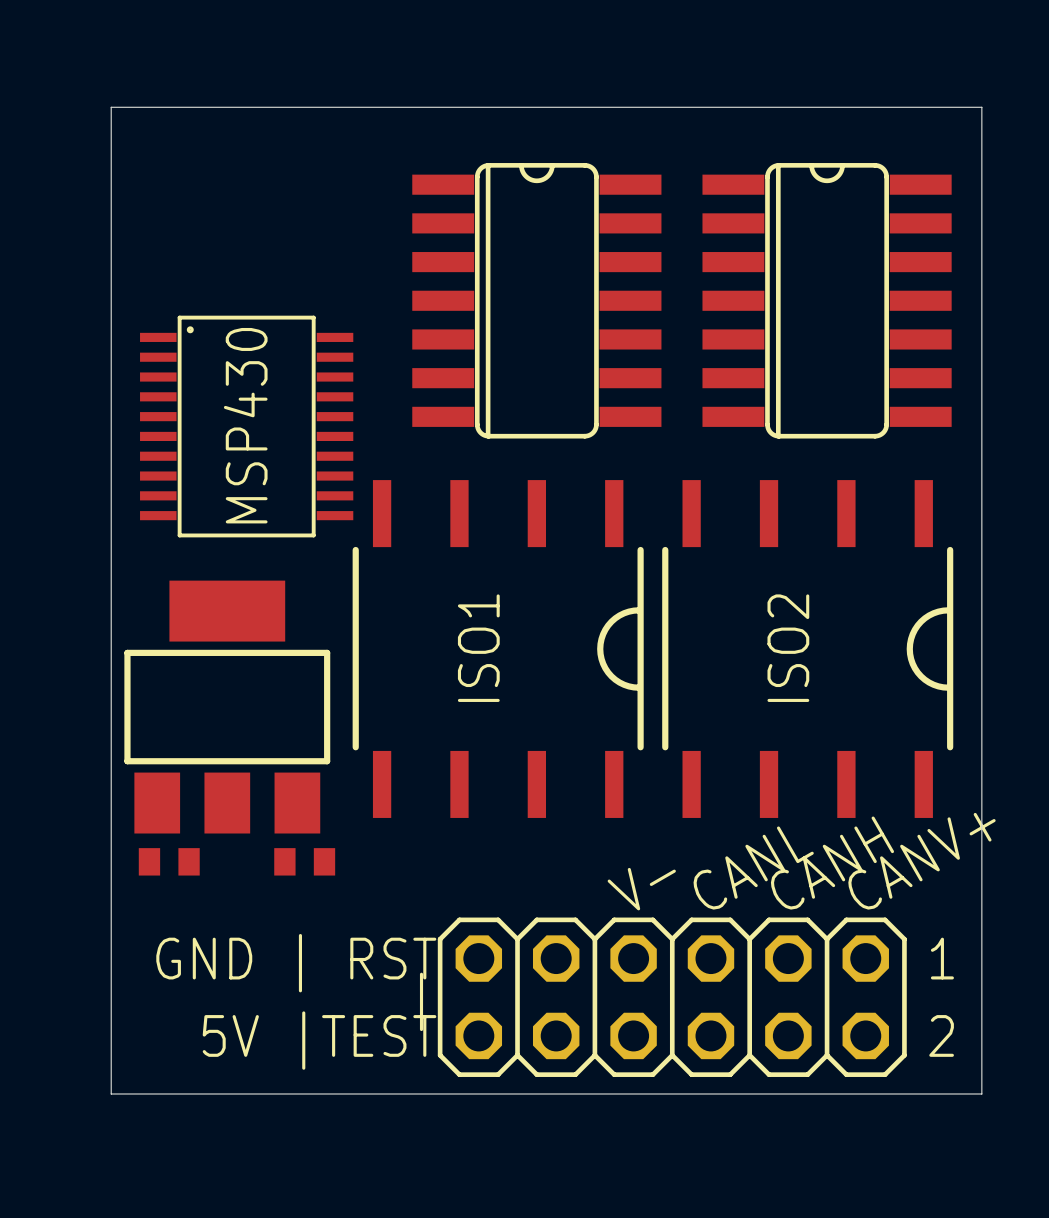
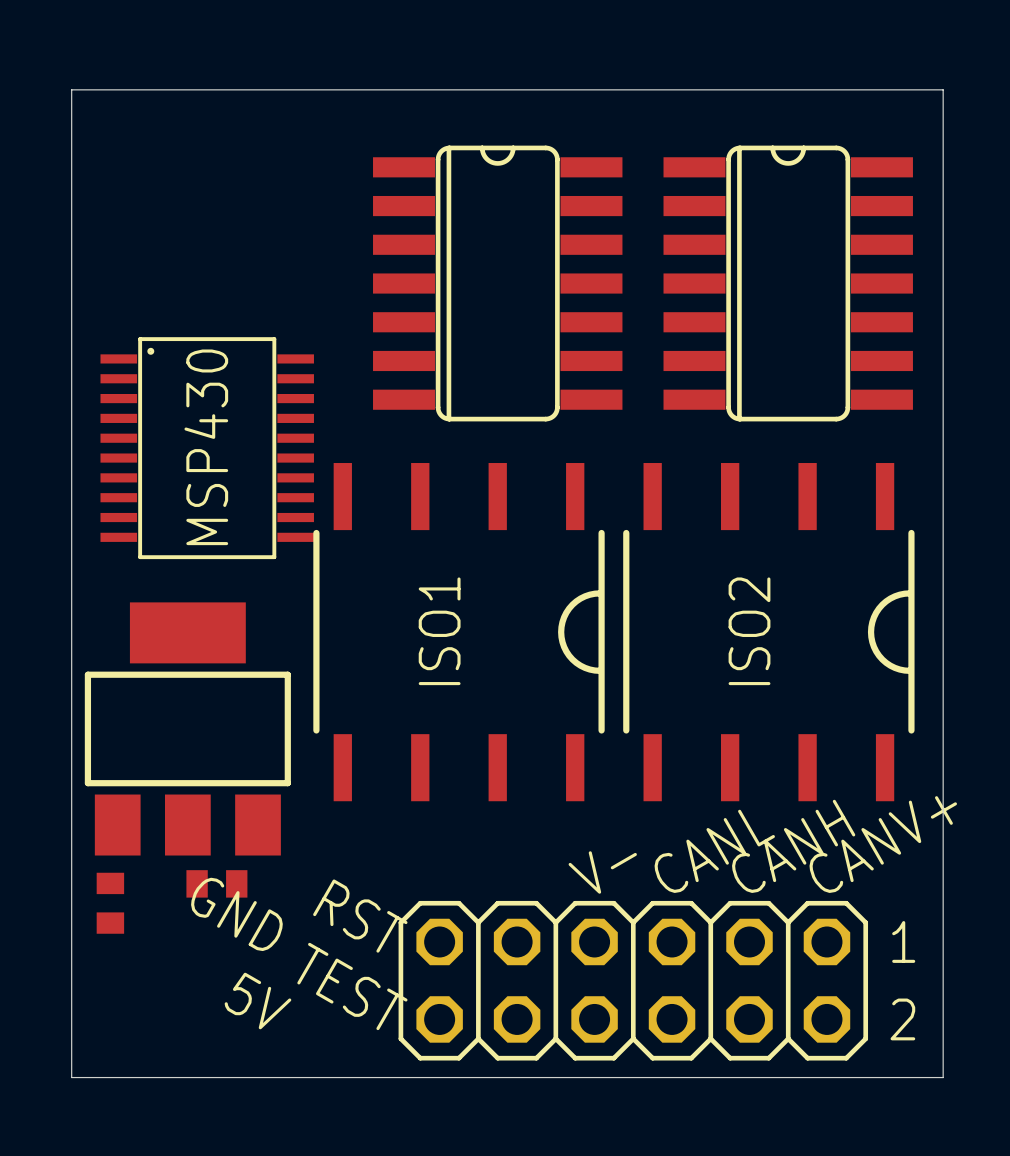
MSP430 position: (246, 426) -> (207, 448)
part position: (227, 707) -> (187, 728)
part: (169, 861) -> none
part: (304, 861) -> none
part: none -> (216, 883)
part: none -> (110, 903)
text: none -> GND (236, 914)
text: GND | RST (296, 963) -> RST (360, 916)
text: | (421, 1001) -> none
text: none -> 5V (257, 1001)
text: 5V |TEST (319, 1040) -> TEST (352, 986)

